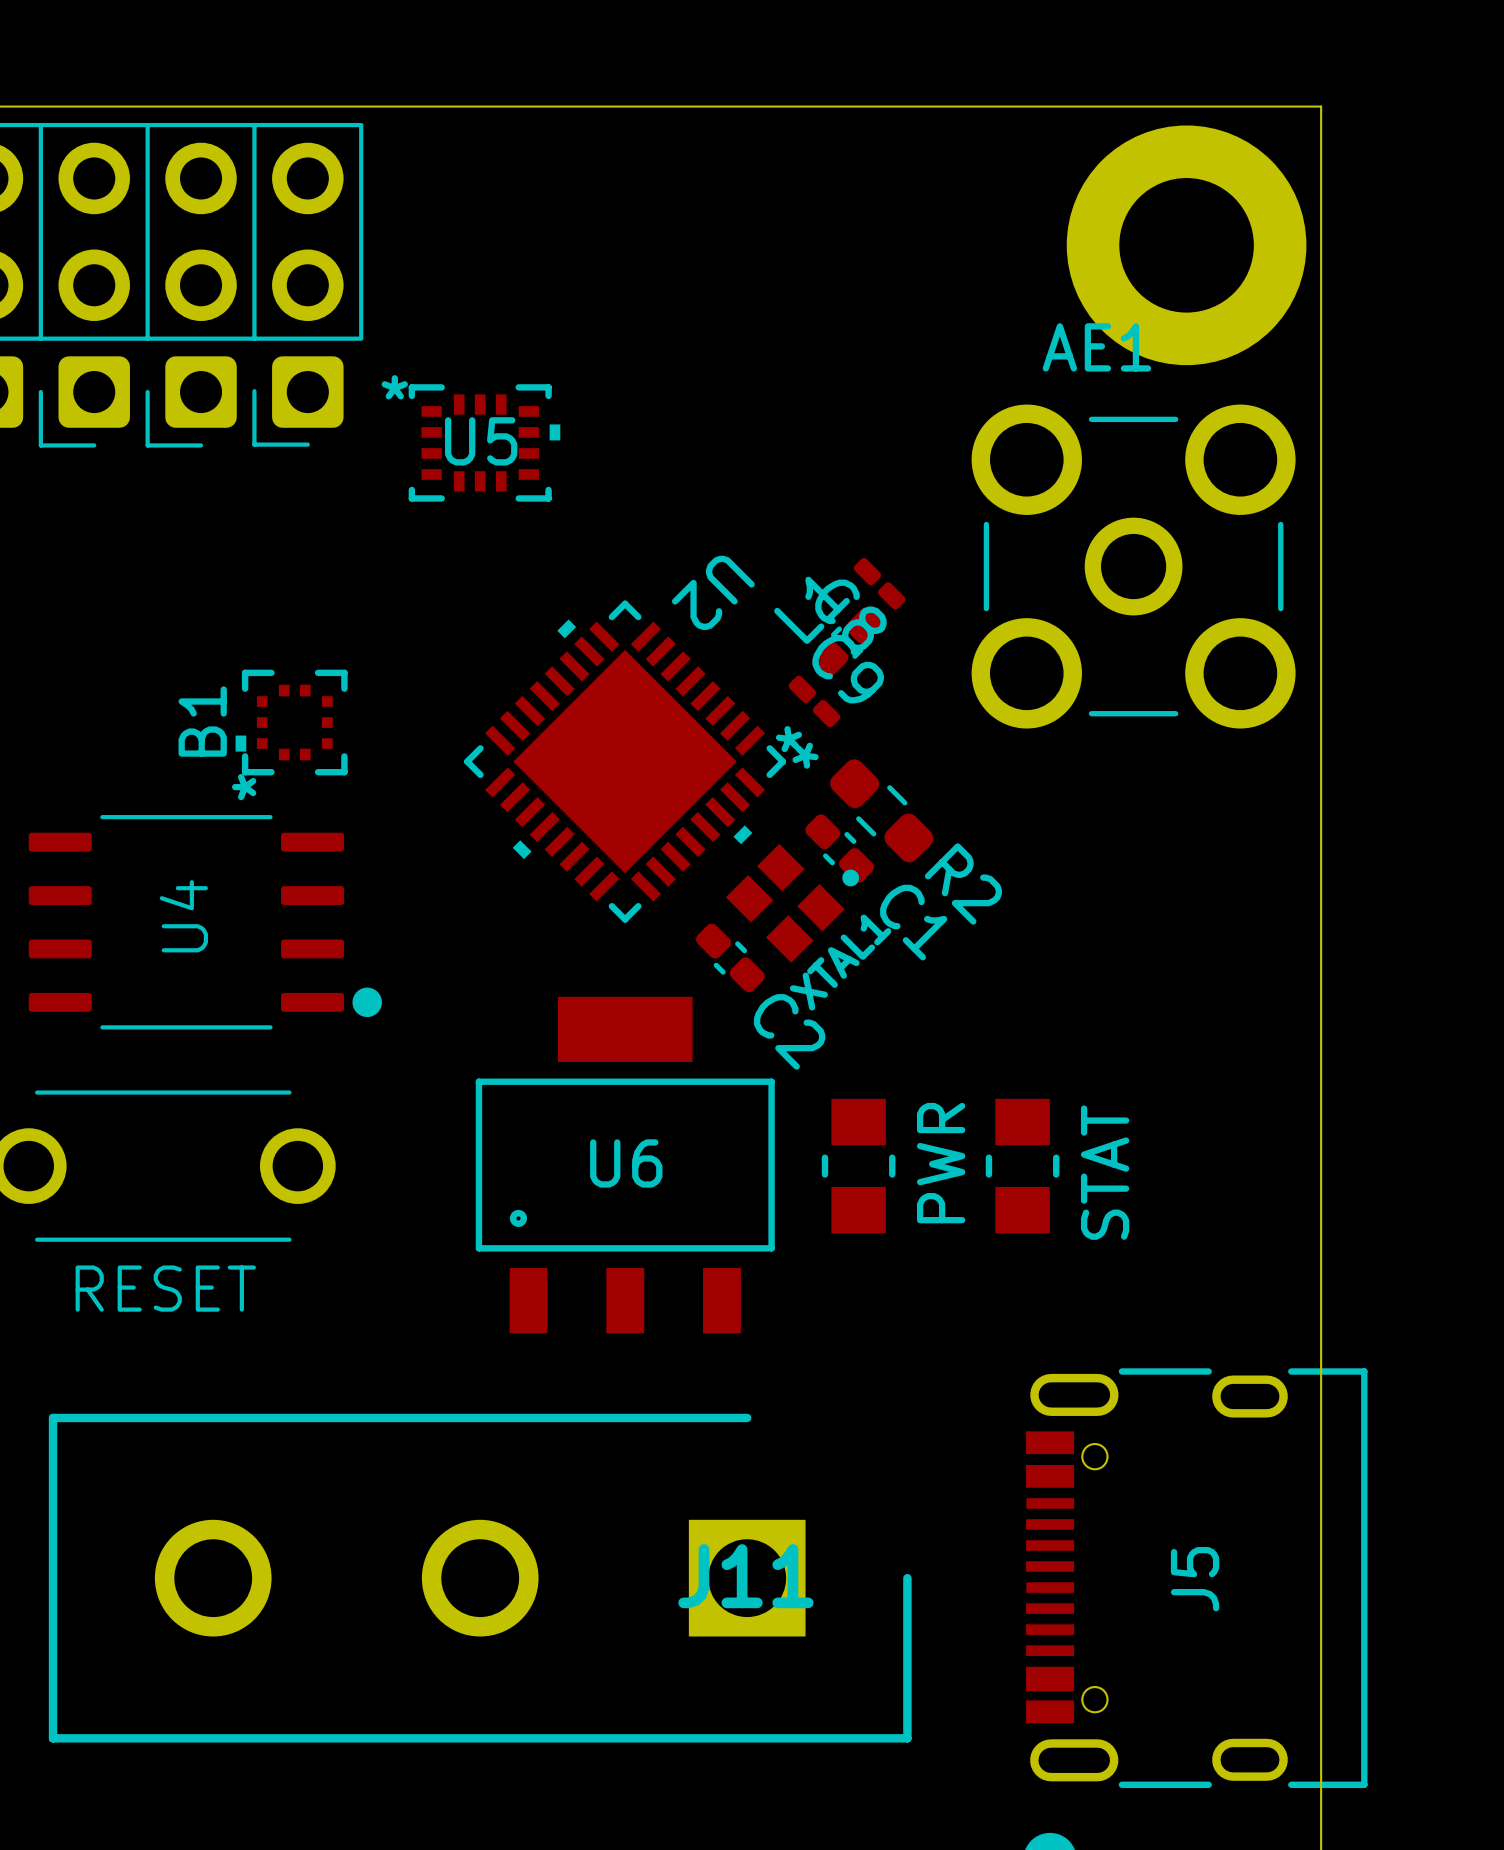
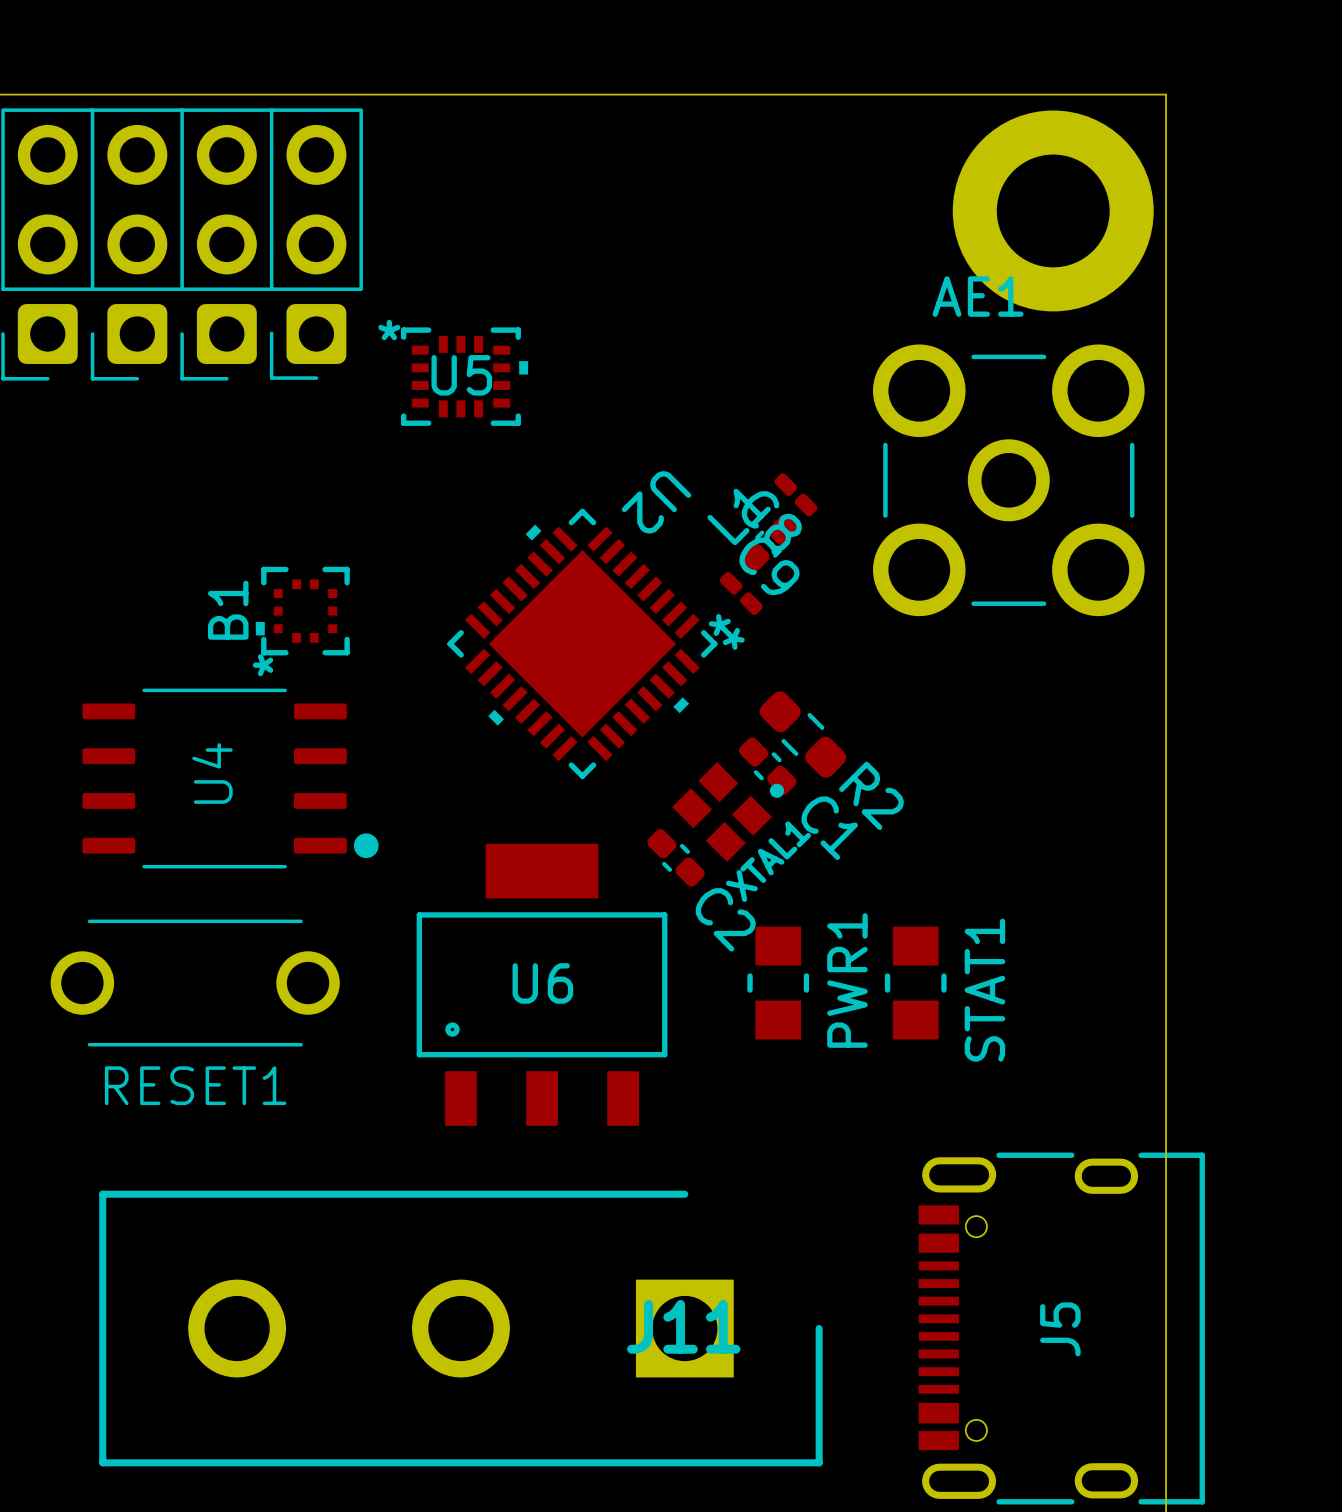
R2 position: (881, 810) -> (802, 734)
C1 position: (839, 848) -> (767, 766)
XTAL1 position: (792, 903) -> (728, 811)
C2 position: (730, 957) -> (676, 857)
PWR name: PWR (941, 1163) -> PWR1 (847, 980)
U6 position: (625, 1165) -> (542, 984)
STAT name: STAT (1105, 1172) -> STAT1 (984, 990)
RESET name: RESET (165, 1288) -> RESET1 (195, 1085)

